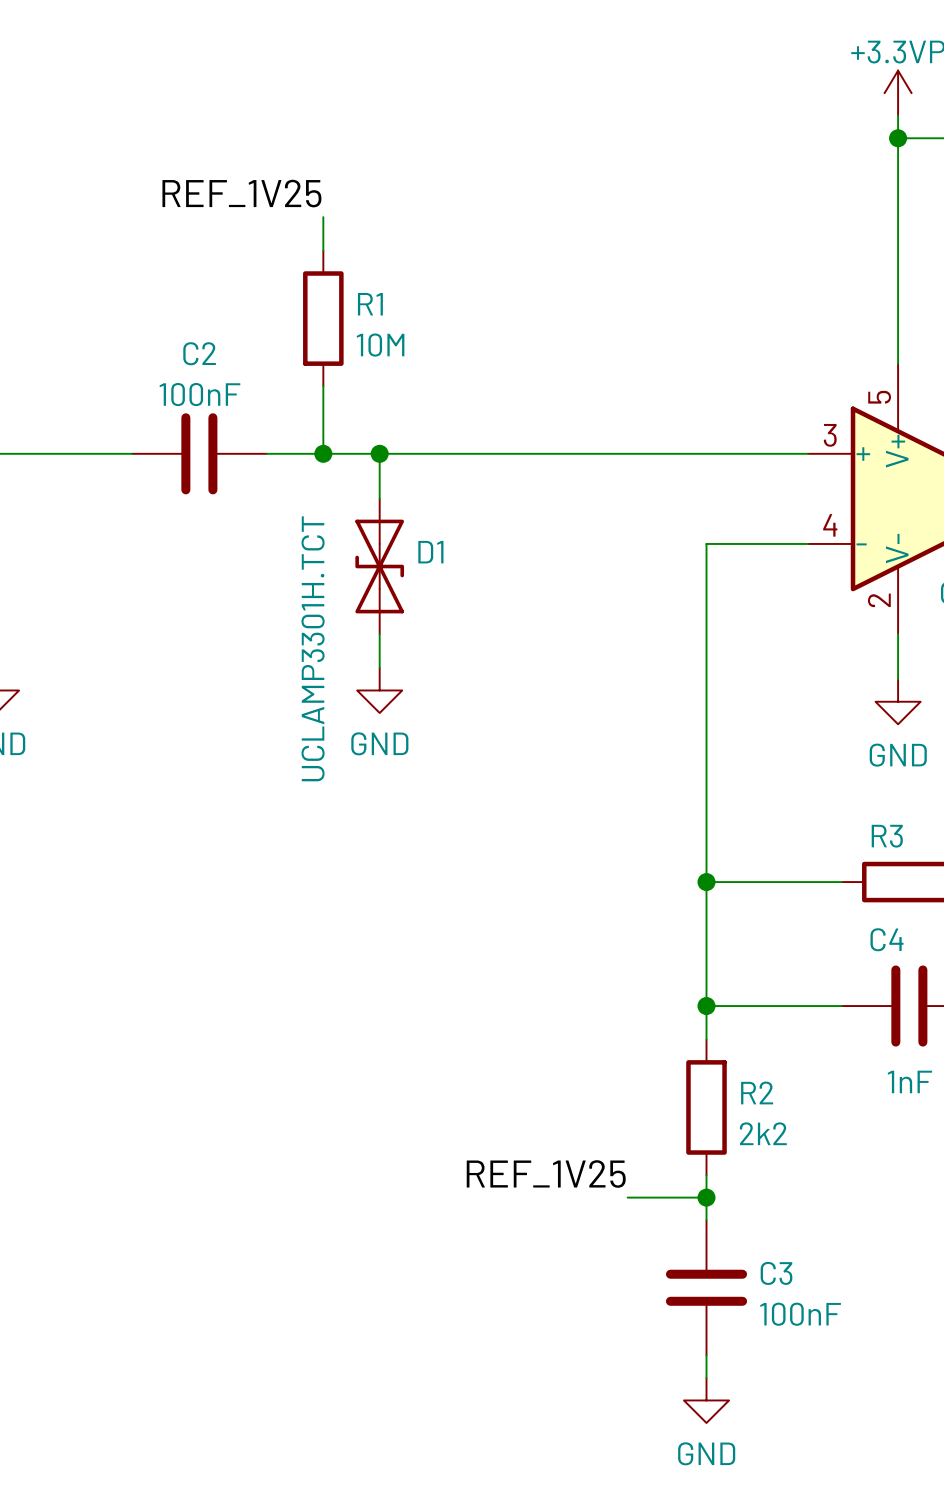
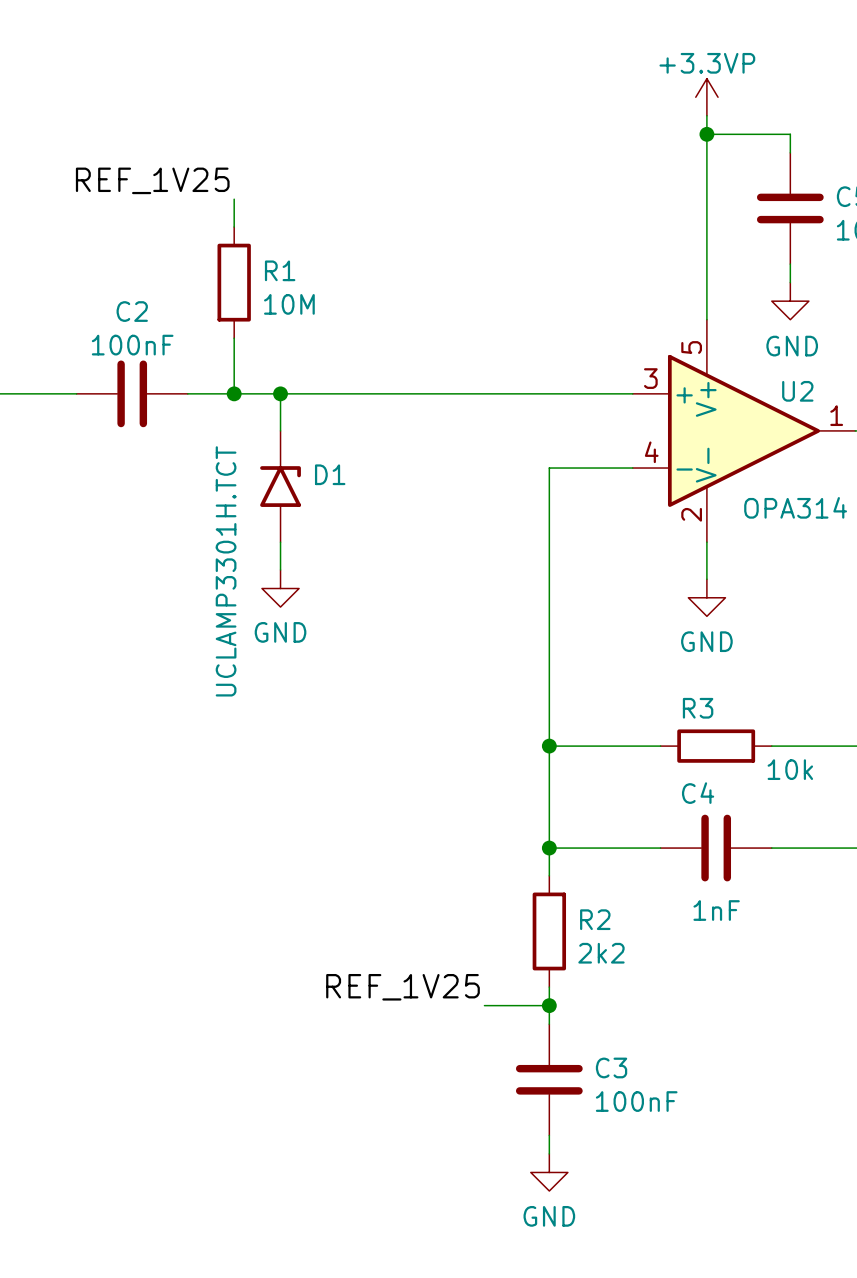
D1 symbol: [355, 498, 405, 635] -> [260, 430, 301, 543]

